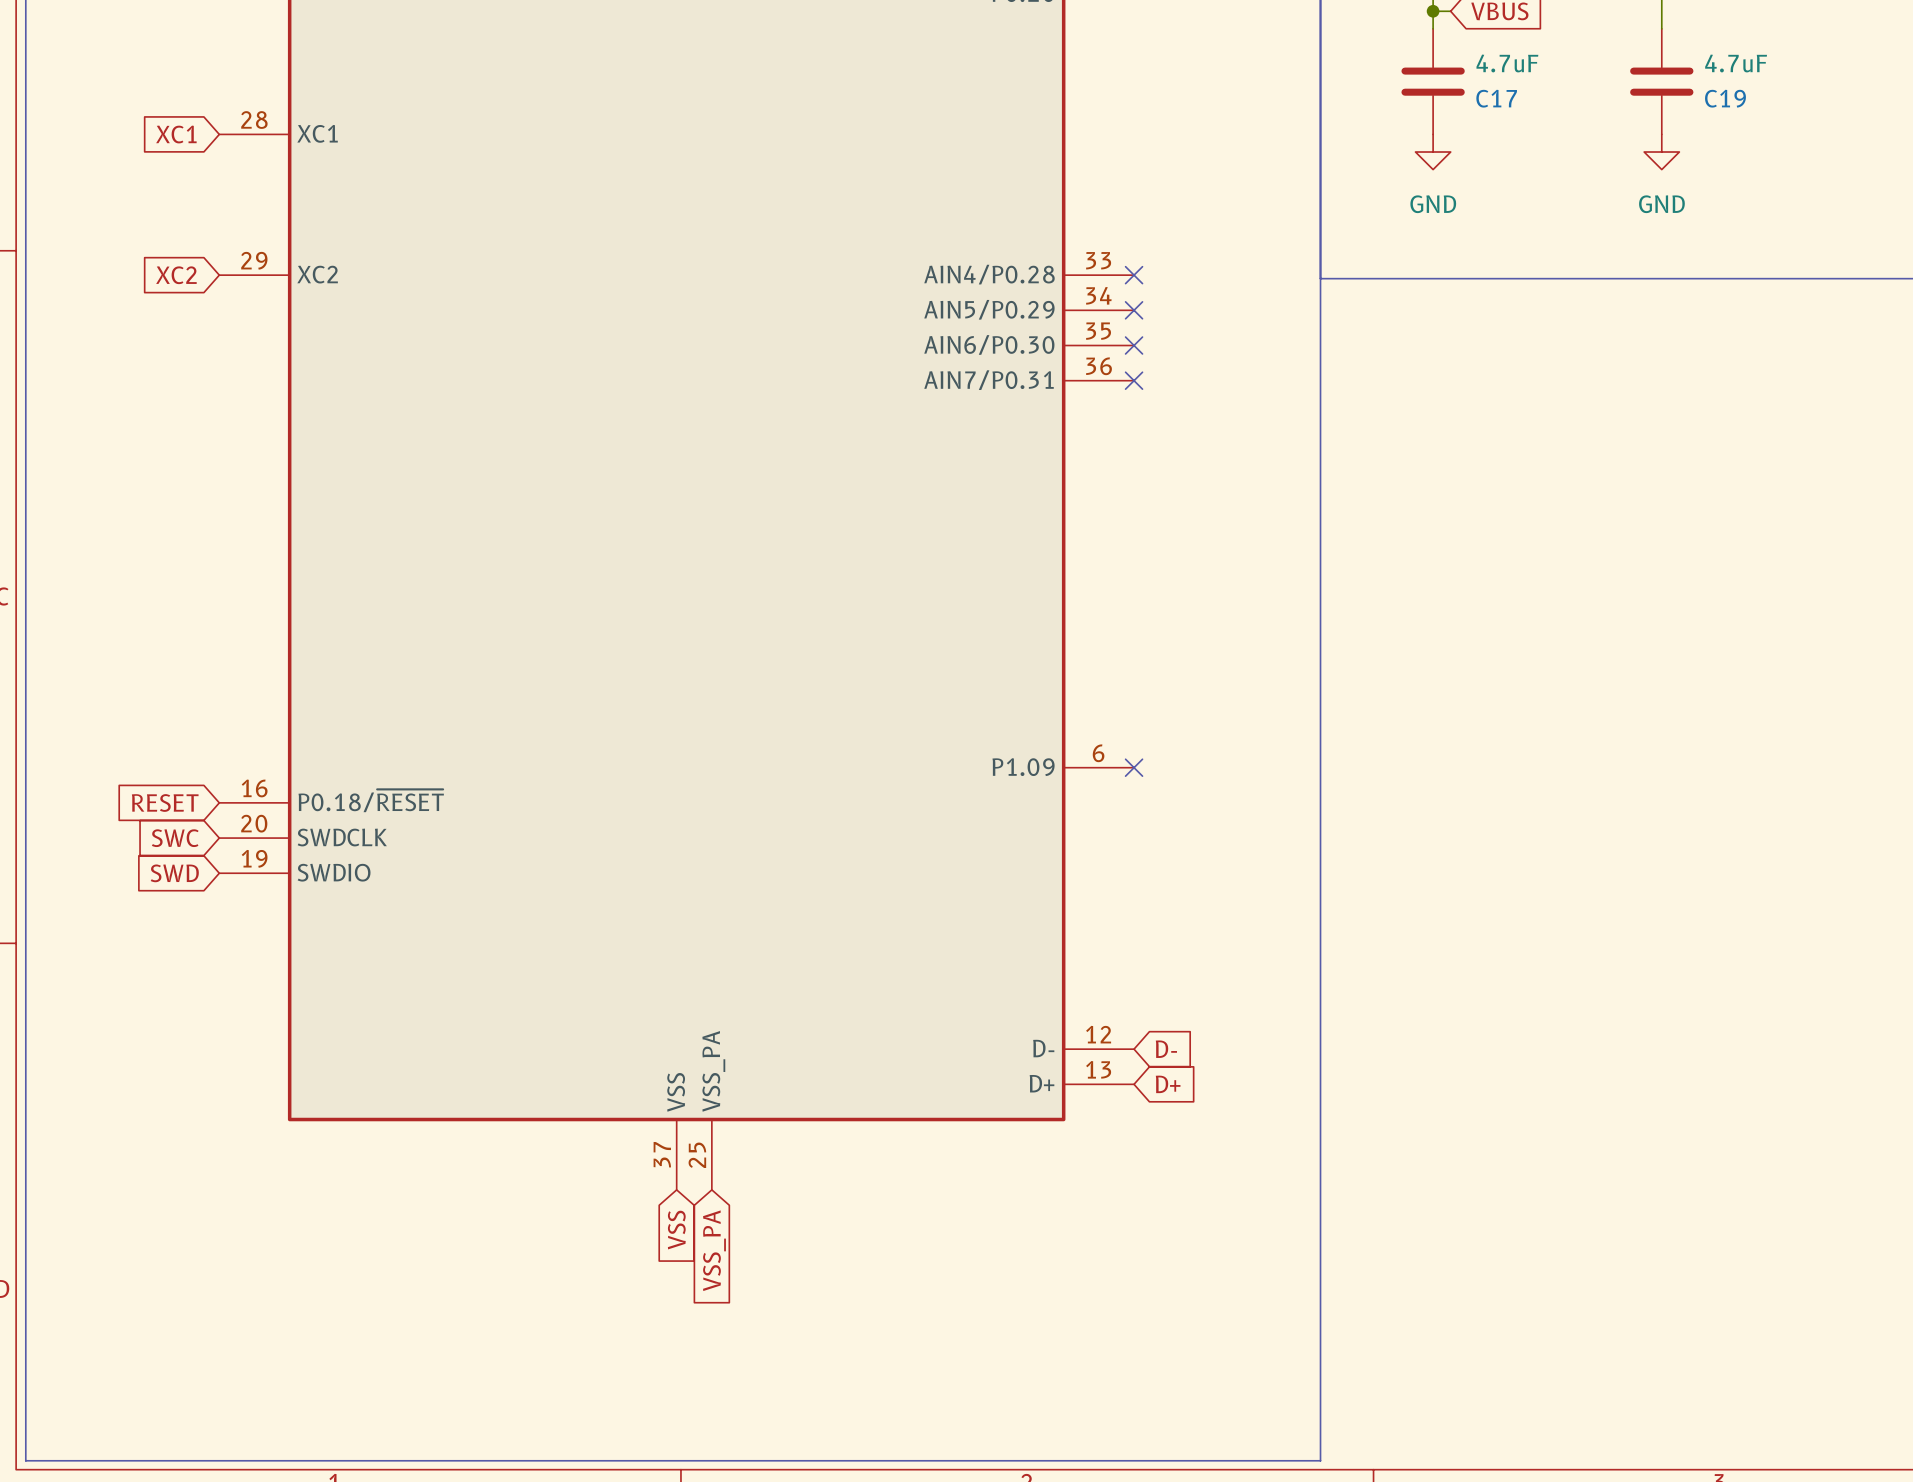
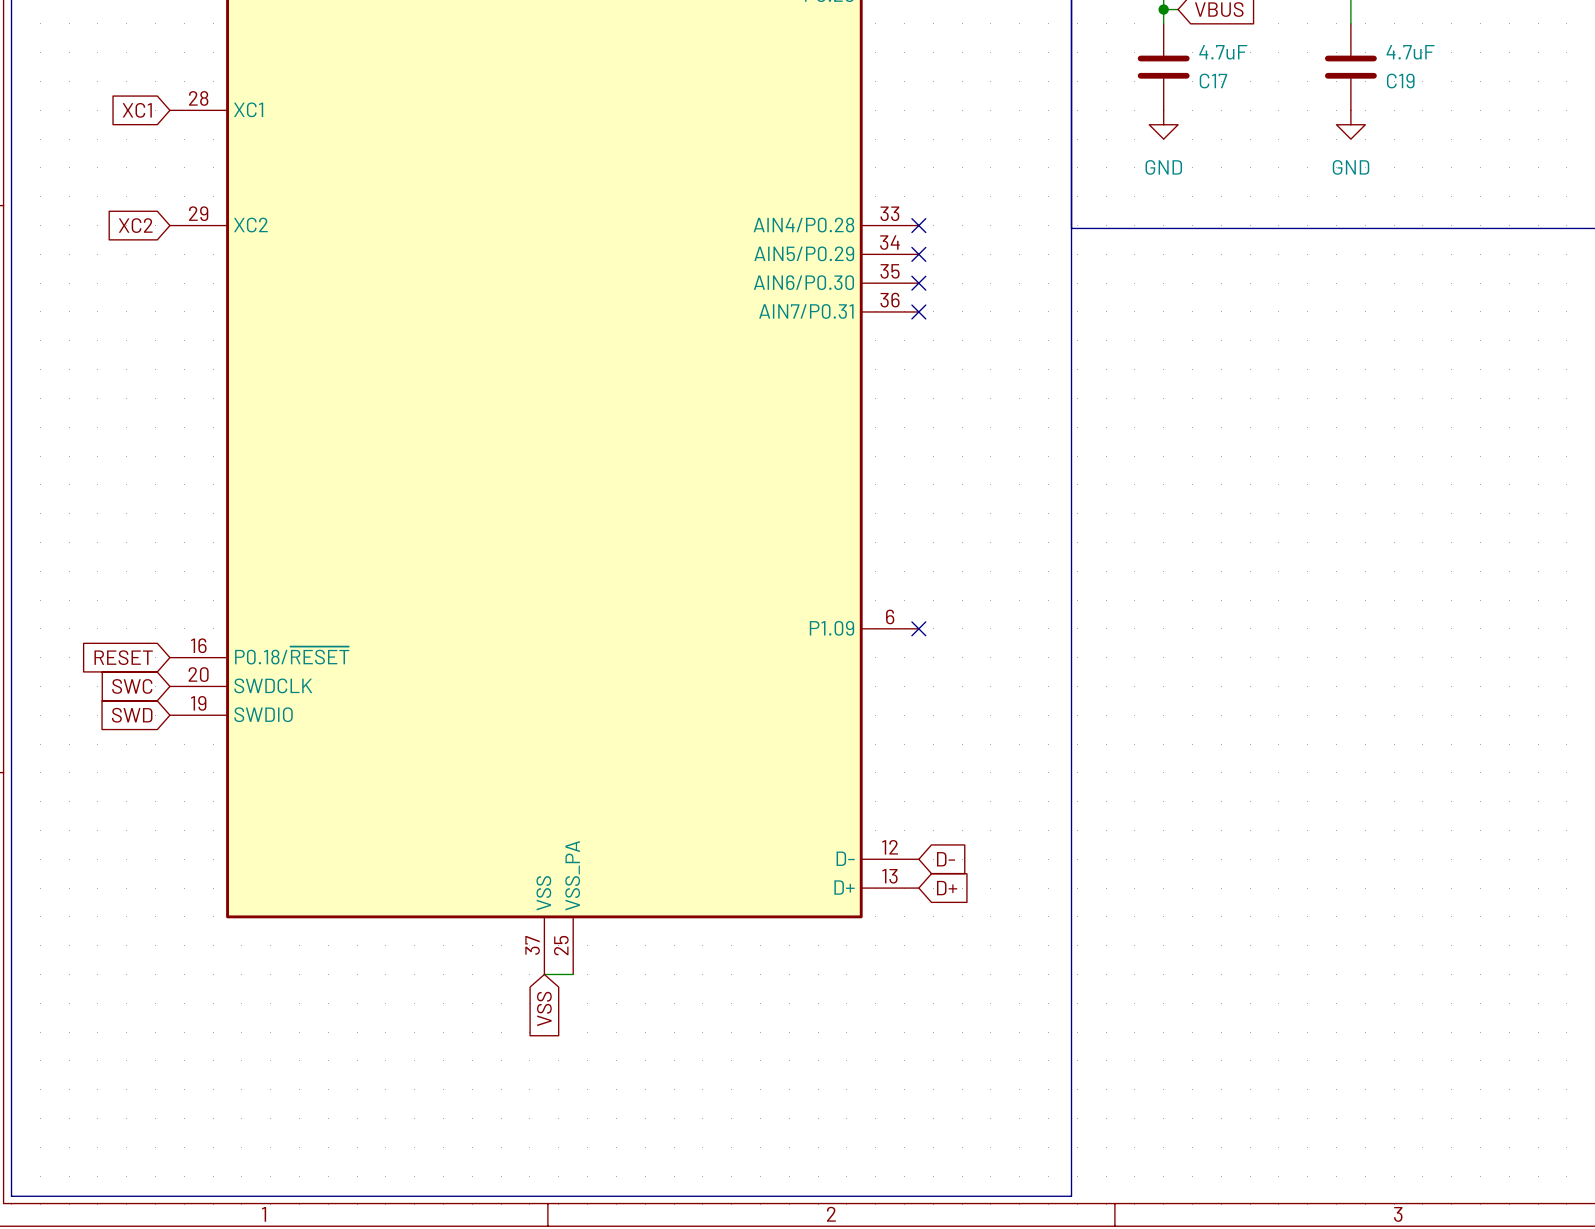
wire: none -> (544, 974) (573, 974)
global label: VSS_PA (714, 1250) -> none

